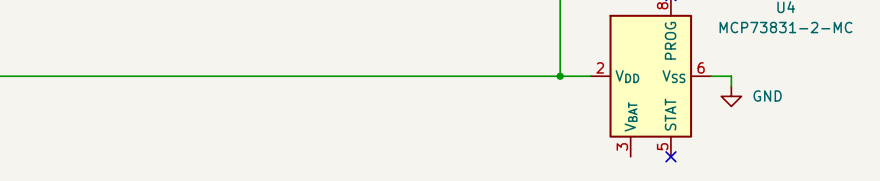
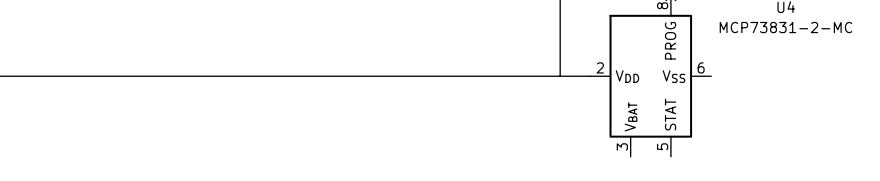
junction: (560, 76) -> none
wire: (711, 76) (731, 76) (731, 86) -> none
power symbol: GND (731, 96) -> none
no-connect mark: (670, 156) -> none

